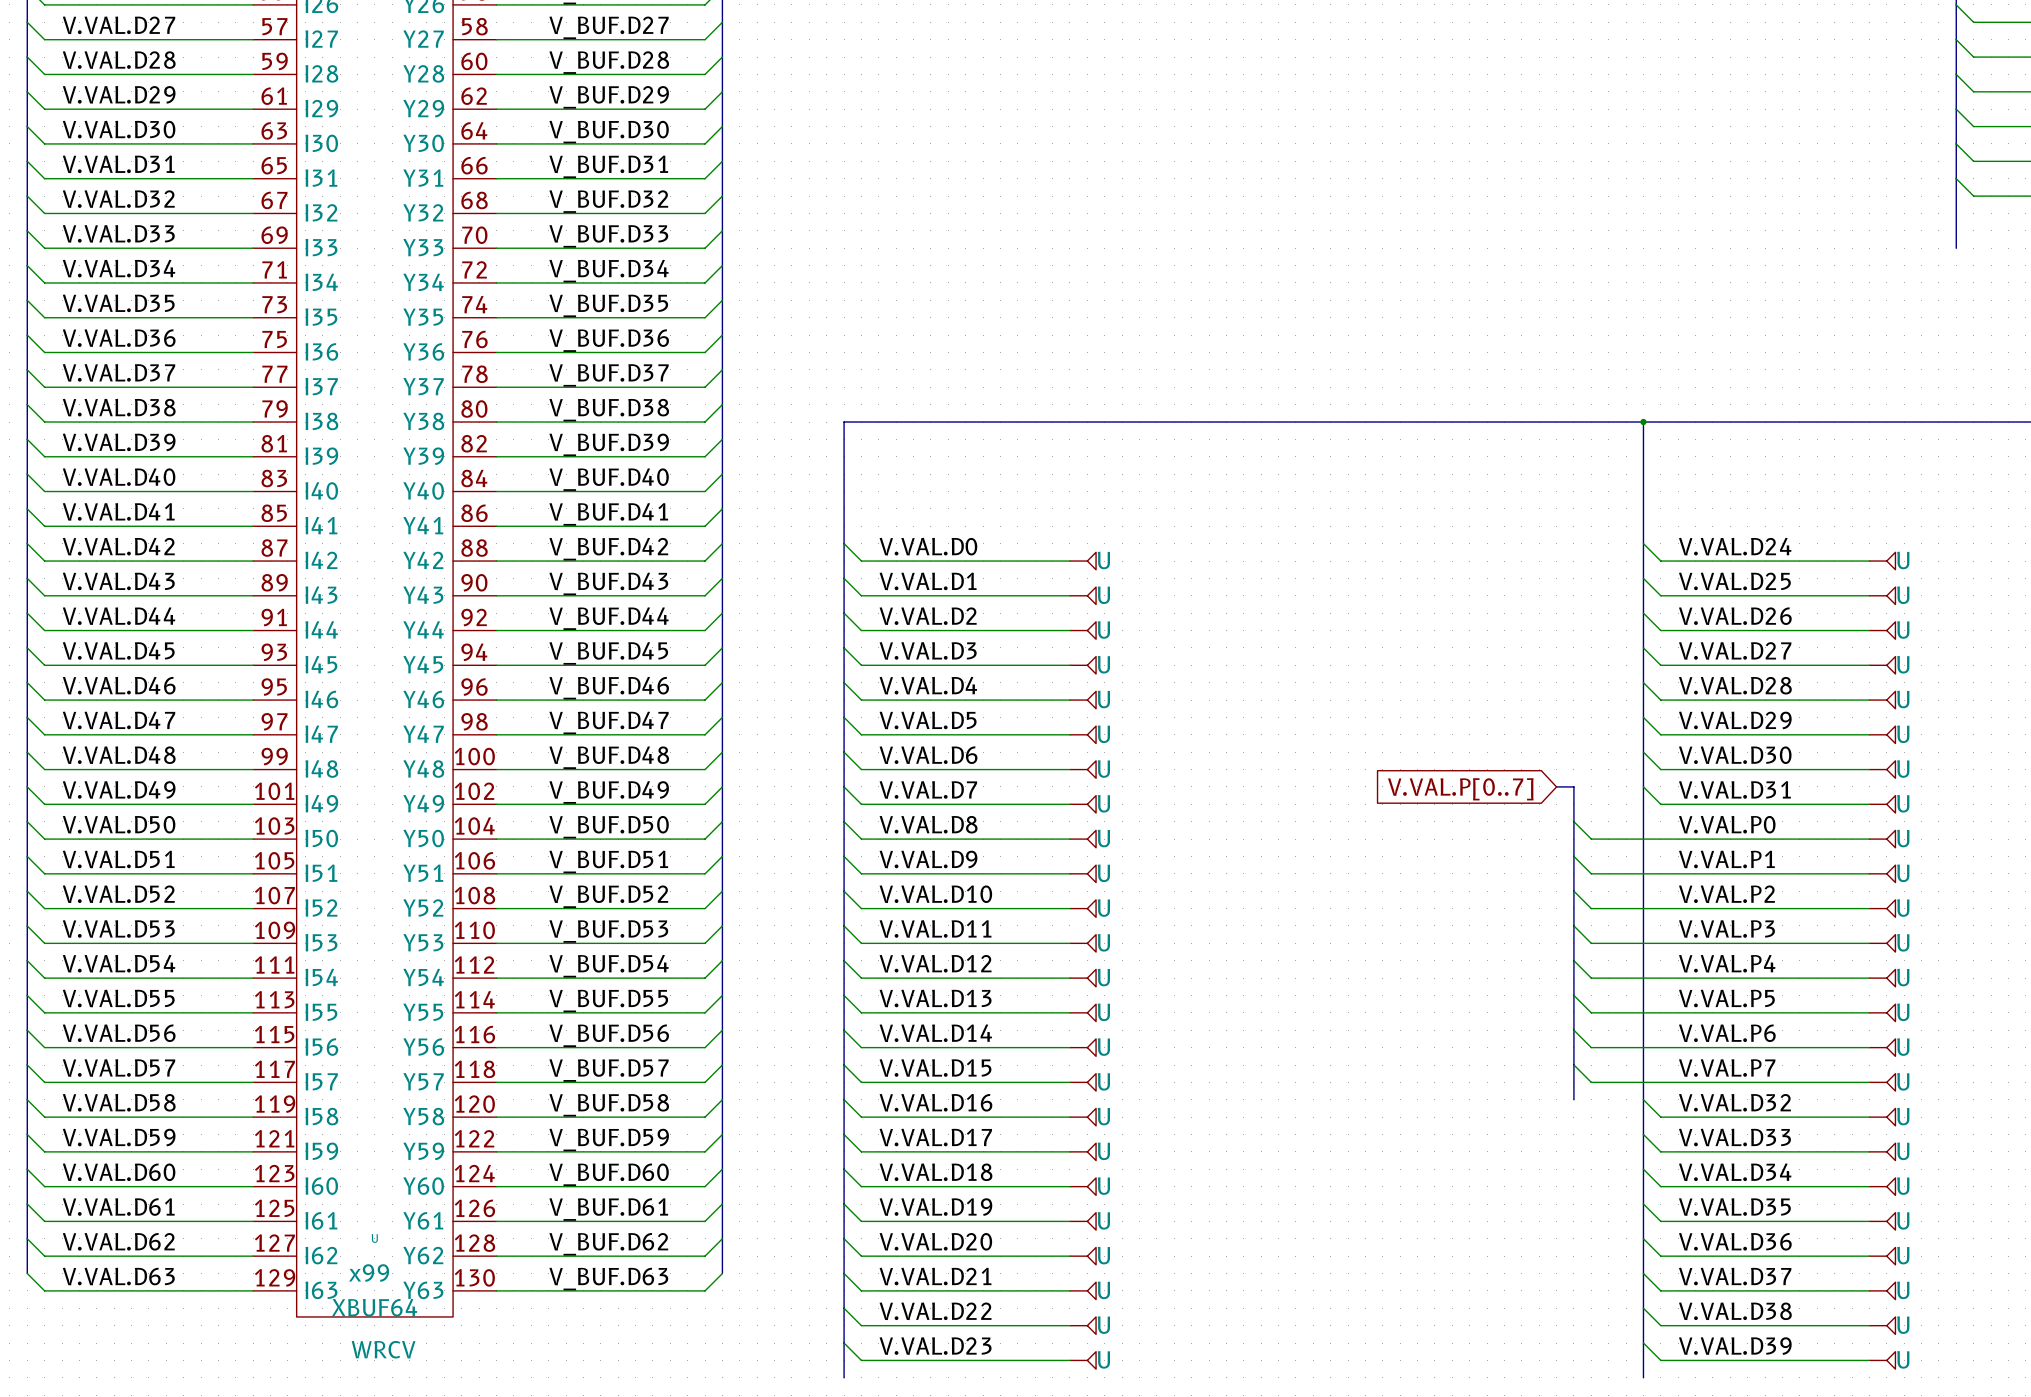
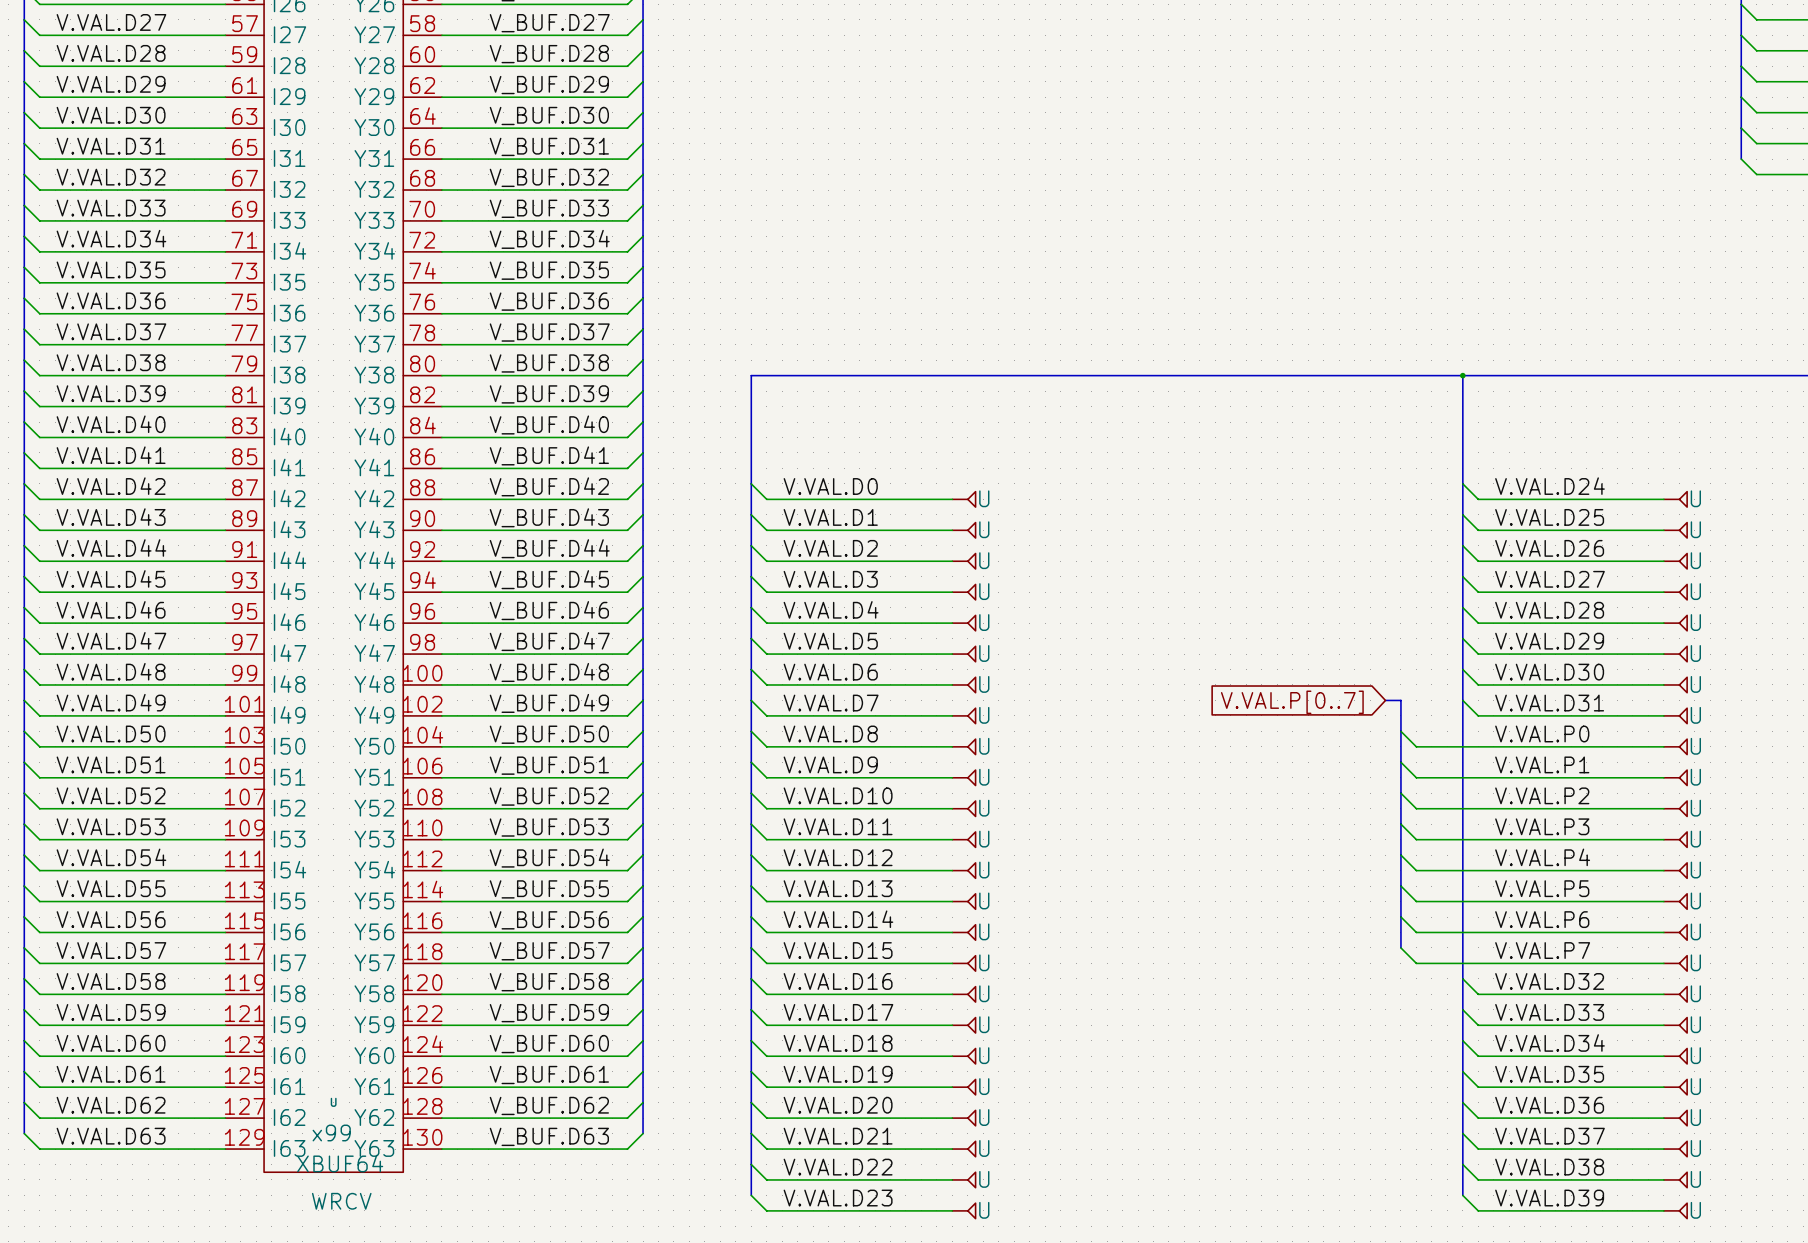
bus: (1956, 178) (1956, 248) -> none
bus: (1573, 1065) (1573, 1099) -> none
bus: (844, 1343) (844, 1377) -> none
bus: (1643, 1343) (1643, 1377) -> none

